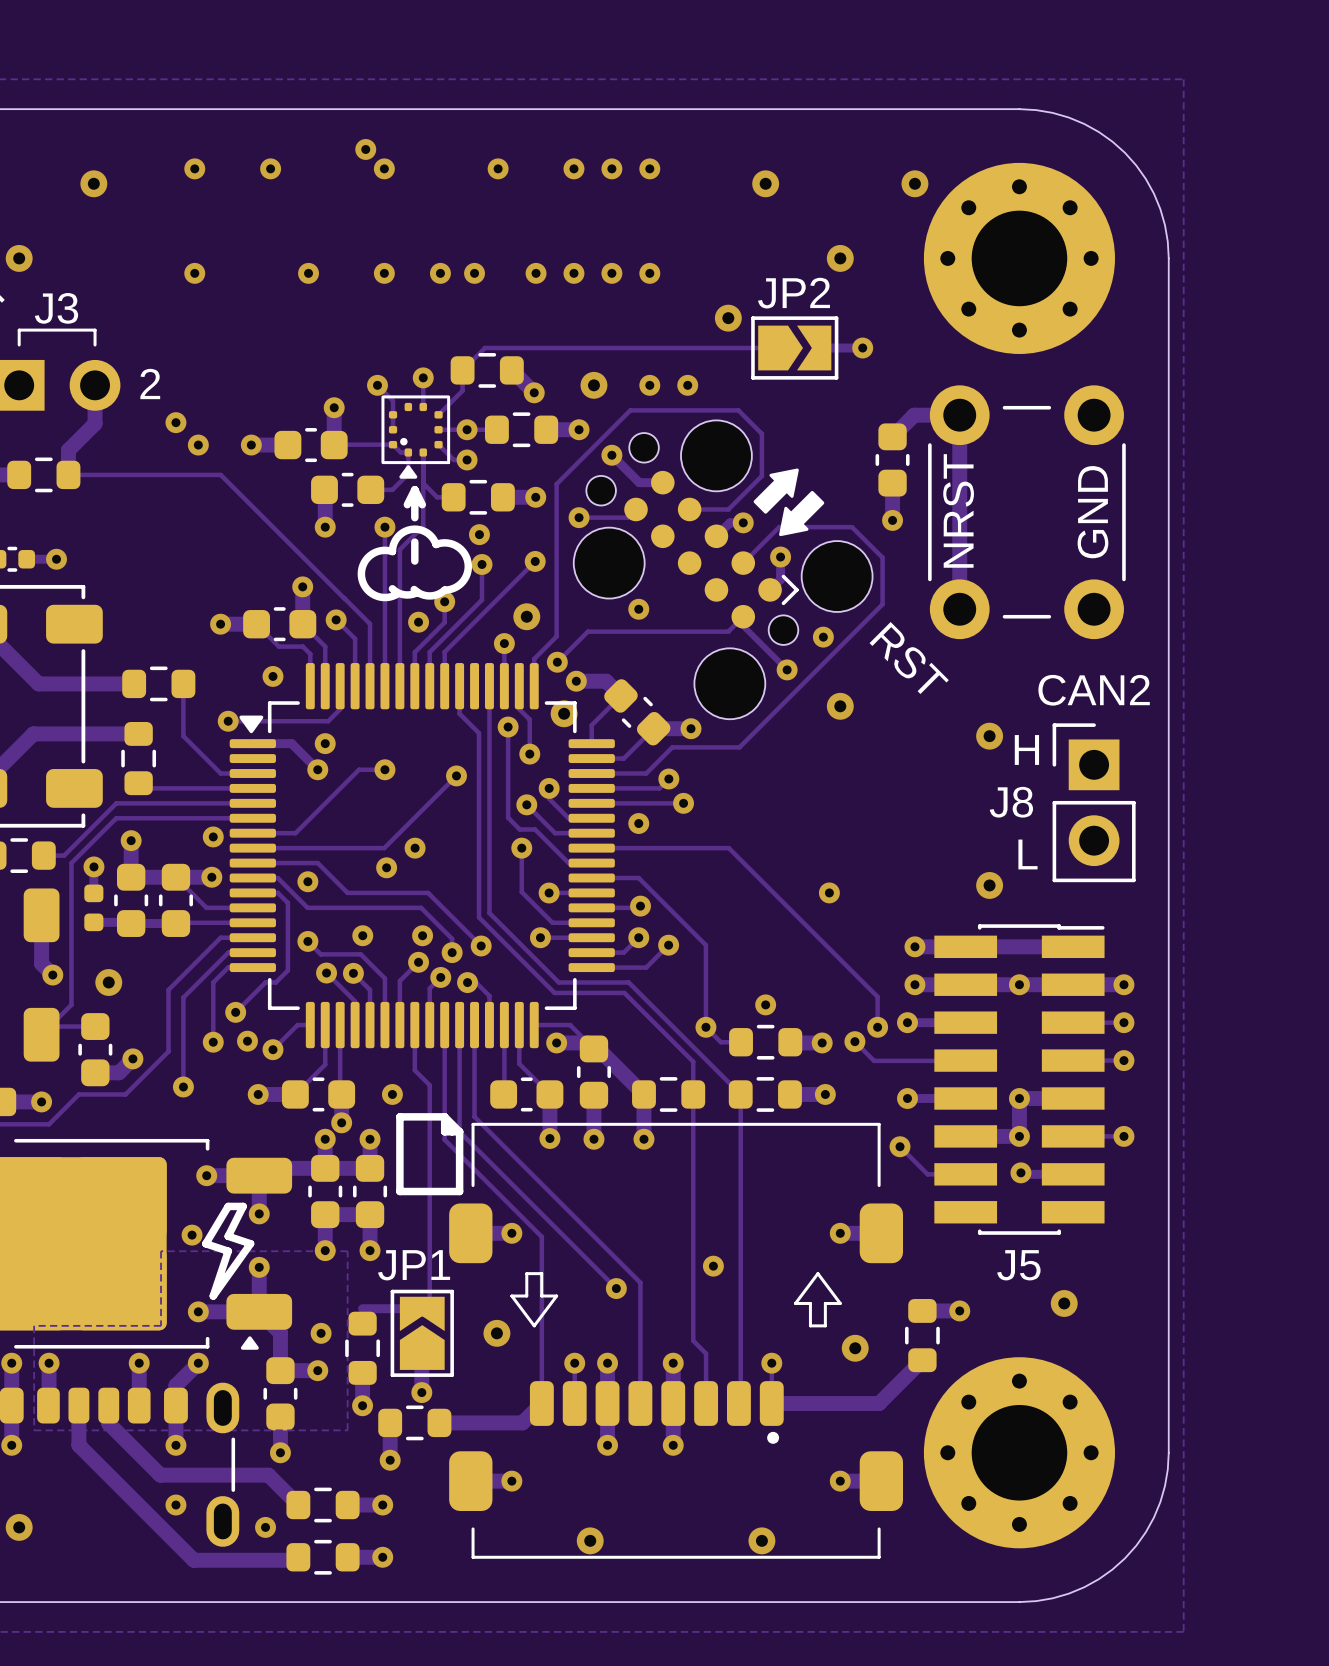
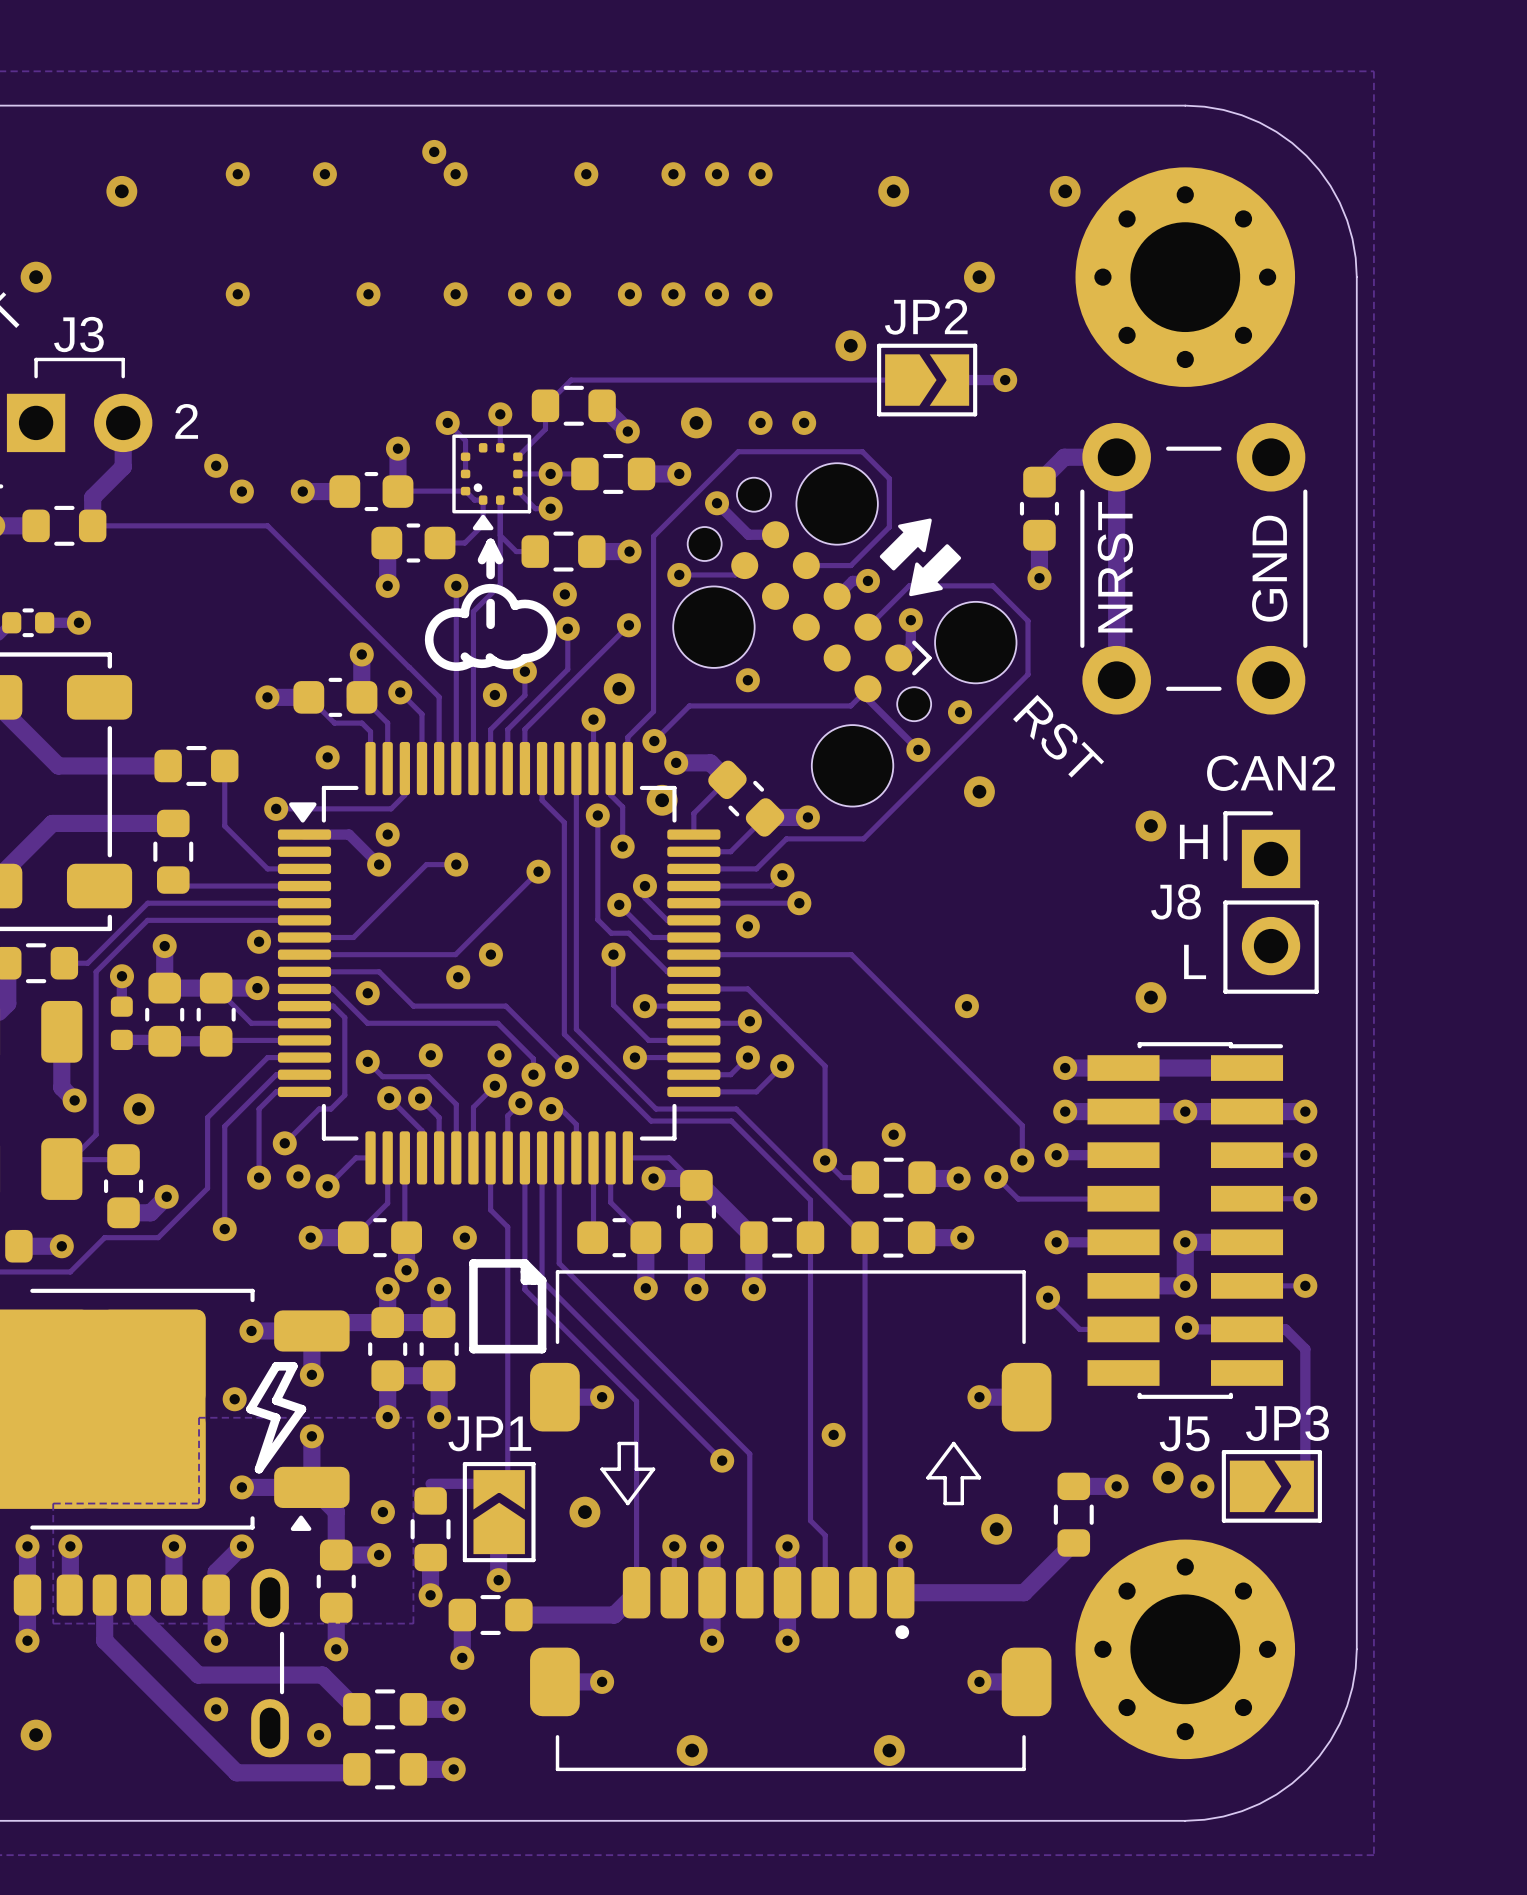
track: none -> (1247, 1329) (1285, 1329) (1305, 1349) (1305, 1477) (1296, 1486)
via position: (1064, 1303) -> (1168, 1477)
via: none -> (1202, 1486)
JP3: none -> (1271, 1486)

